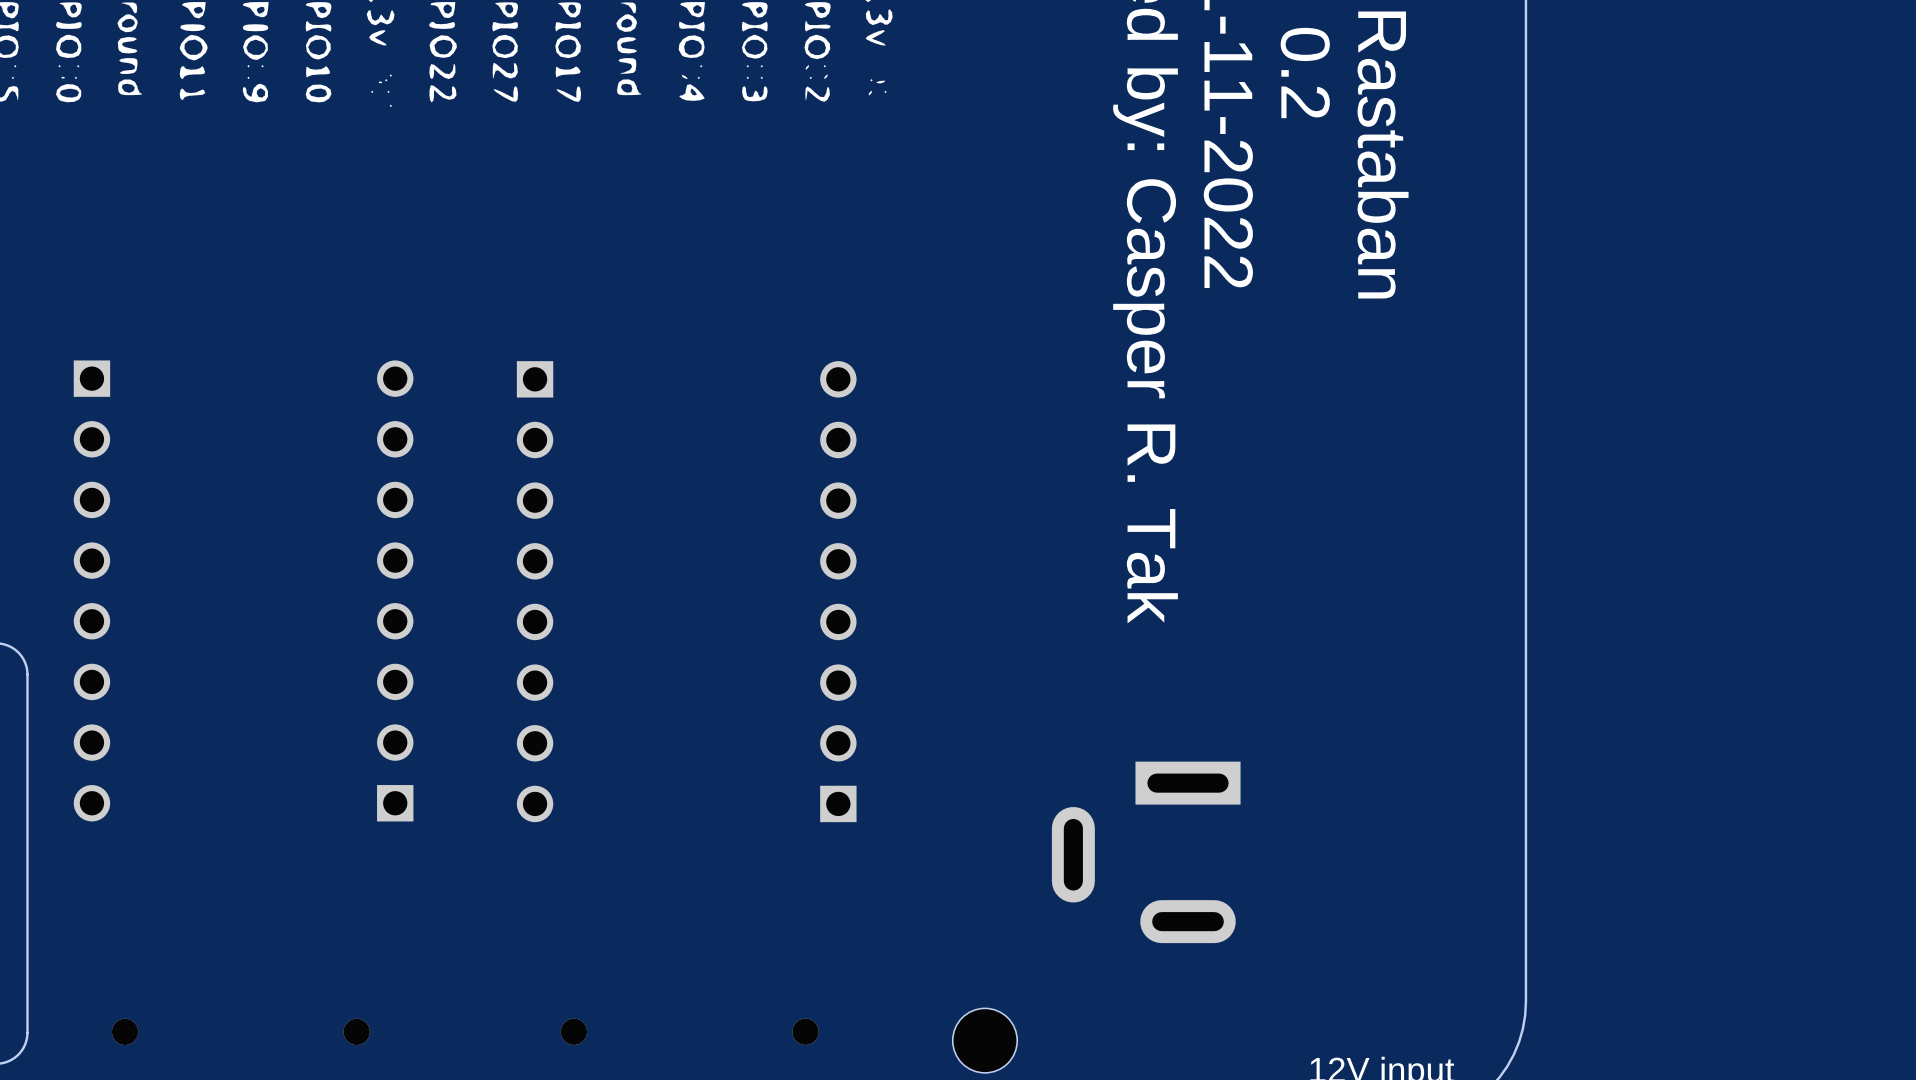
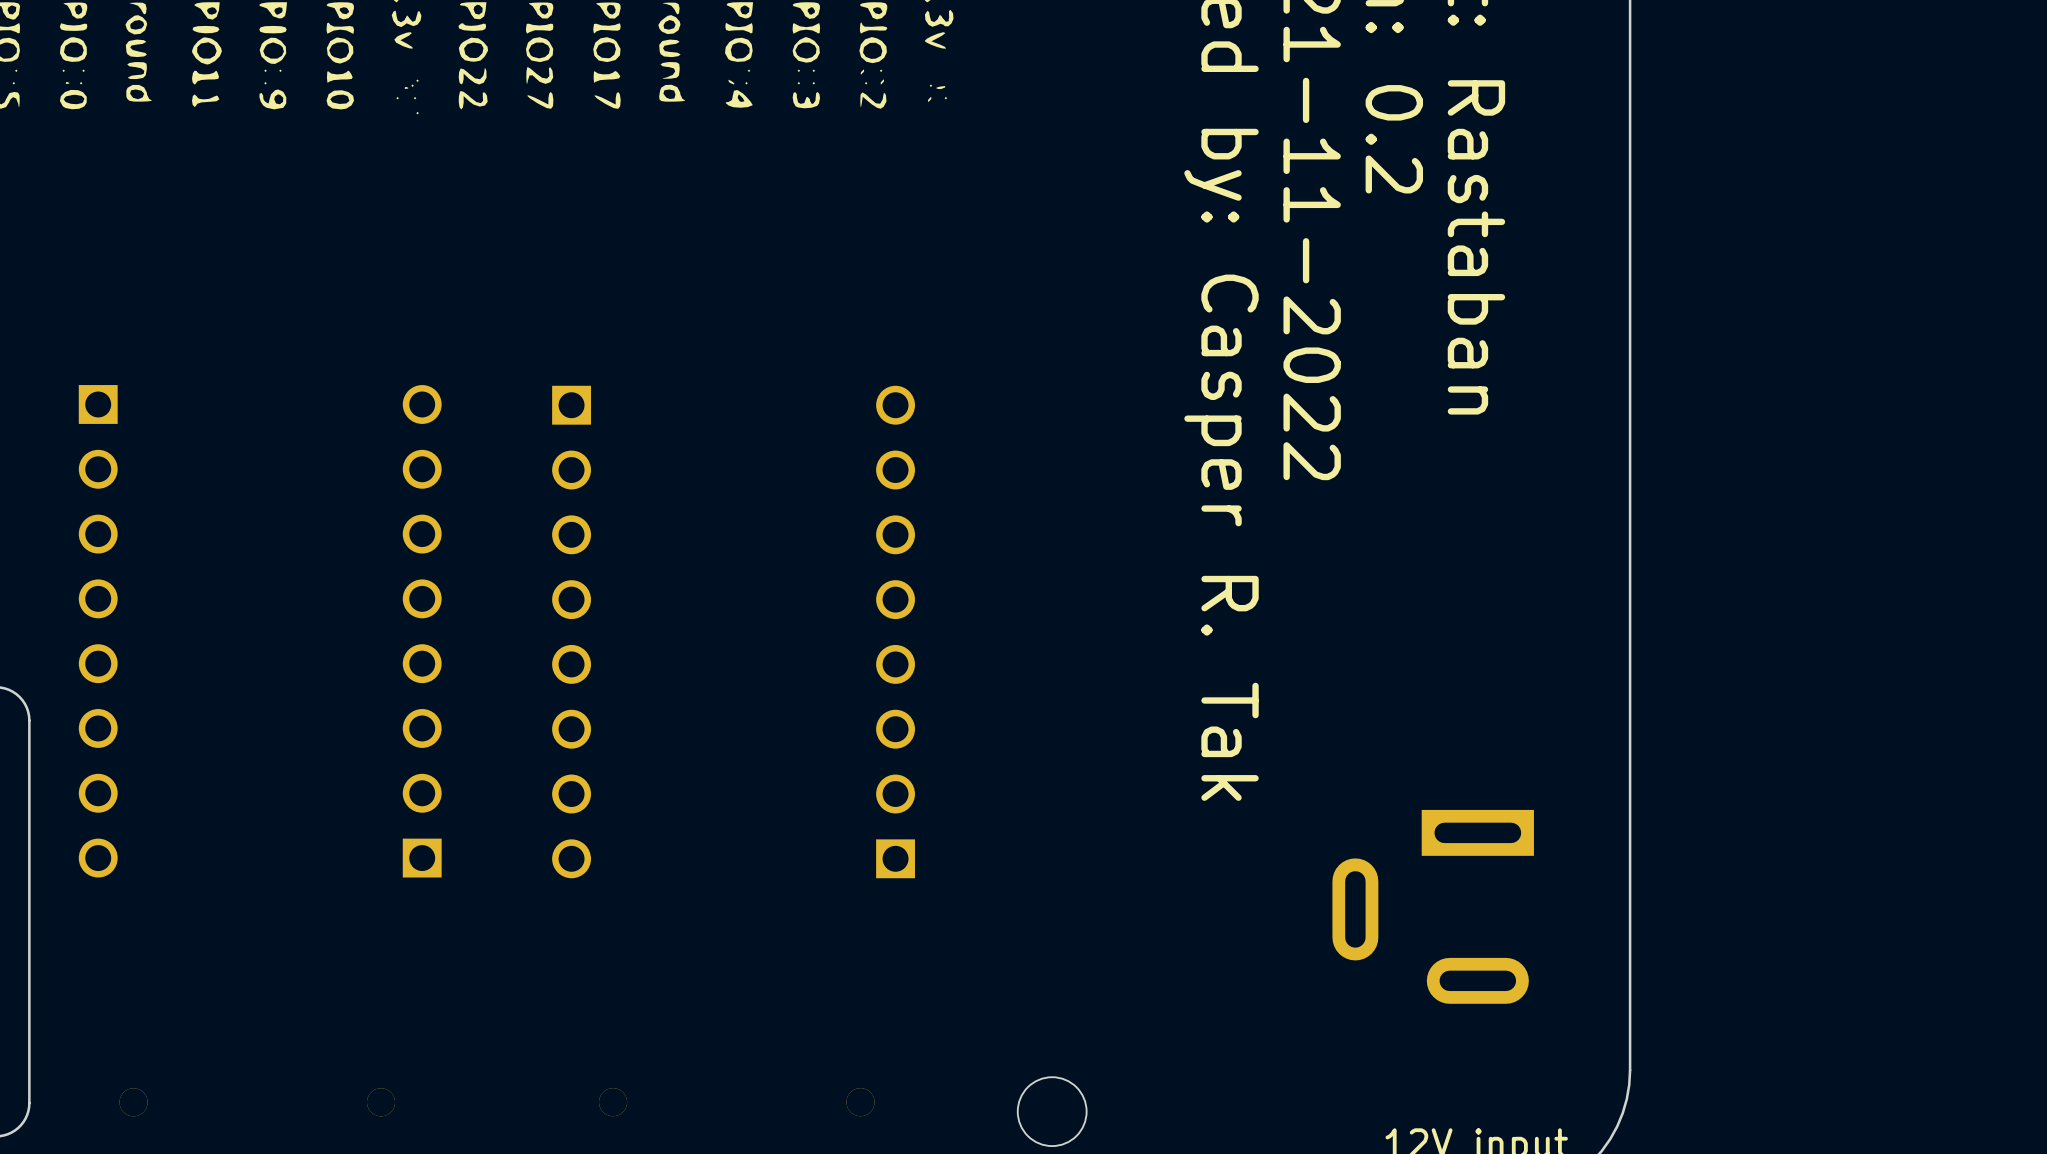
part position: (1146, 852) -> (1433, 906)

